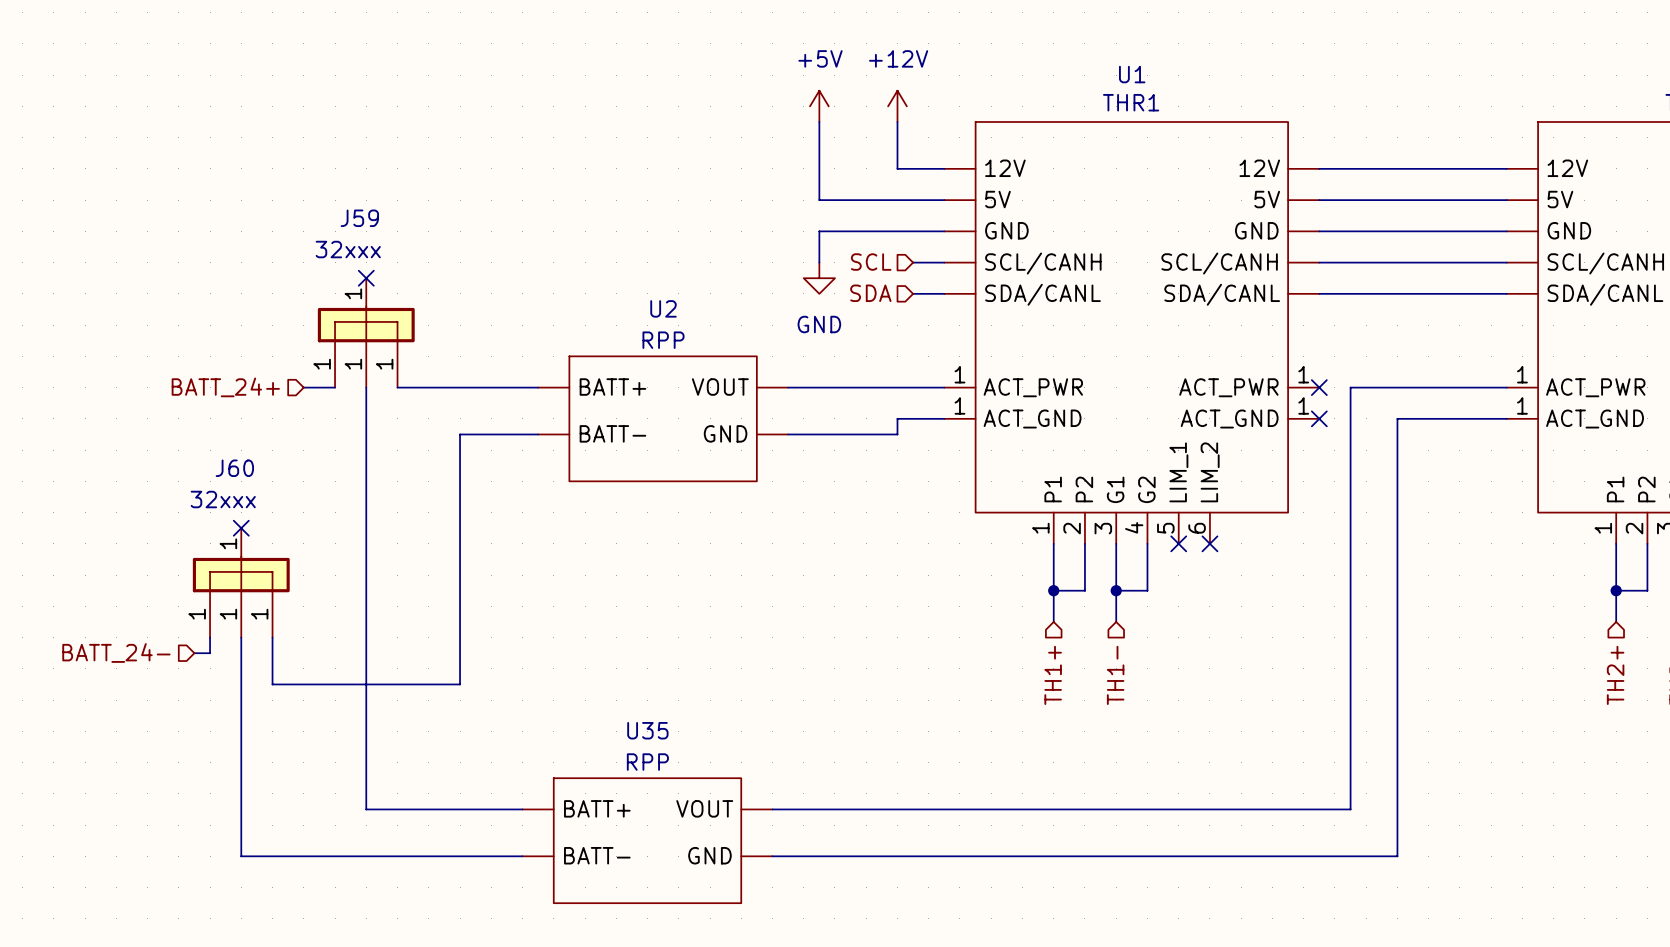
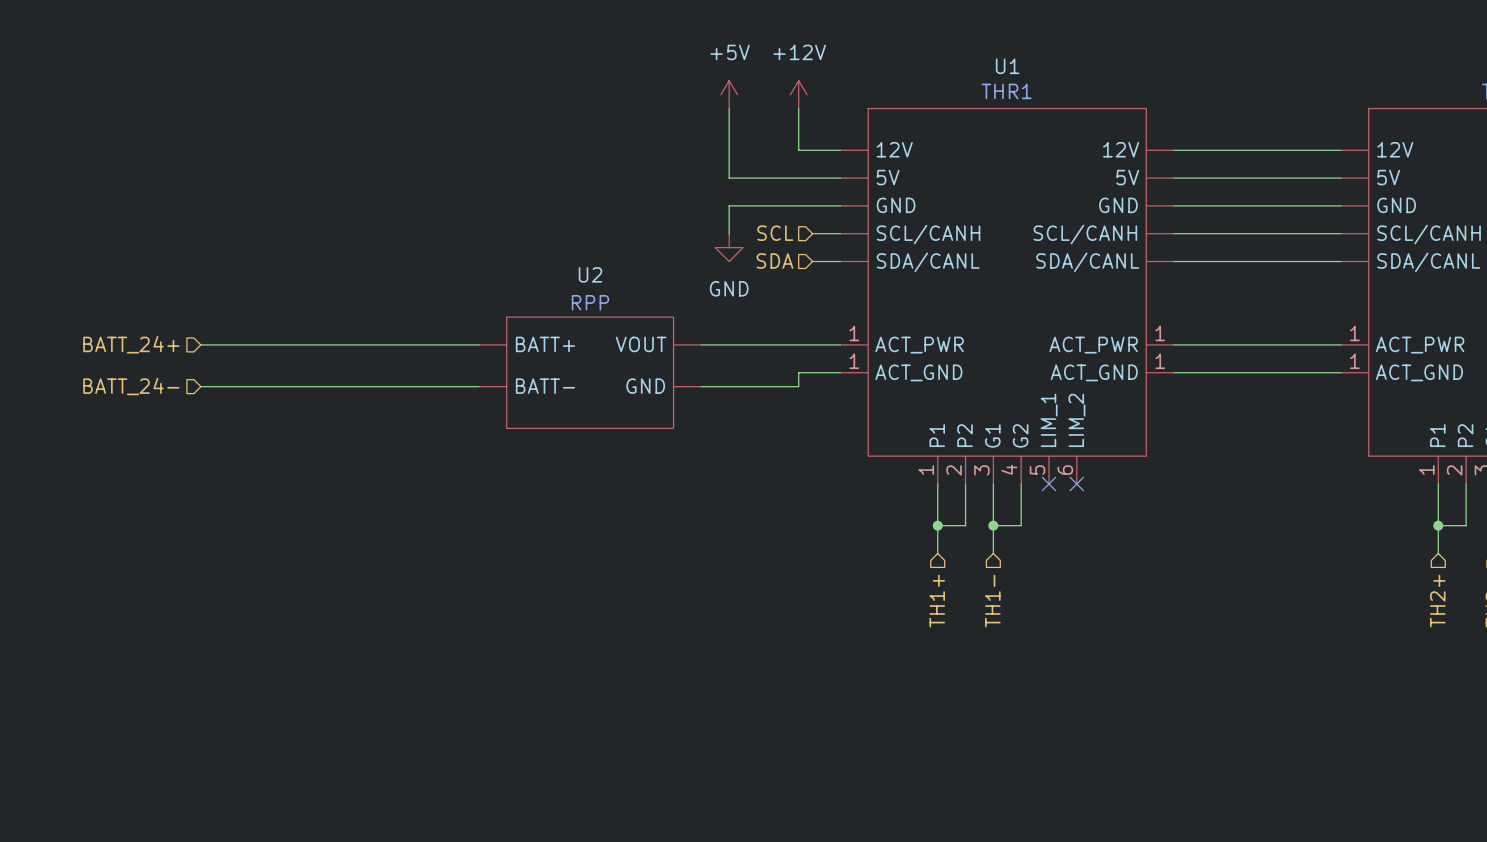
no-connect mark: (366, 278) -> none
J59: 32xxx (366, 332) -> none
wire: none -> (200, 344) (270, 344)
hierarchical label position: BATT_24+ (225, 387) -> BATT_24+ (131, 344)
wire: none -> (298, 344) (353, 344)
wire: (366, 387) (366, 809) (522, 809) -> none
no-connect mark: (1319, 387) -> none
wire: (1350, 387) (1350, 809) (772, 809) -> (1201, 344) (1174, 344)
no-connect mark: (1319, 418) -> none
wire: (1397, 418) (1397, 856) (772, 856) -> (1243, 372) (1174, 372)
wire: (460, 434) (460, 684) (272, 684) (272, 637) -> (409, 386) (200, 386)
no-connect mark: (241, 528) -> none
J60: 32xxx (241, 582) -> none
wire: (210, 637) (210, 653) (194, 653) -> none
wire: (241, 637) (241, 856) (522, 856) -> none
hierarchical label position: BATT_24- (116, 652) -> BATT_24- (131, 386)
text: RPP (647, 762) -> none
U35: (647, 840) -> none

